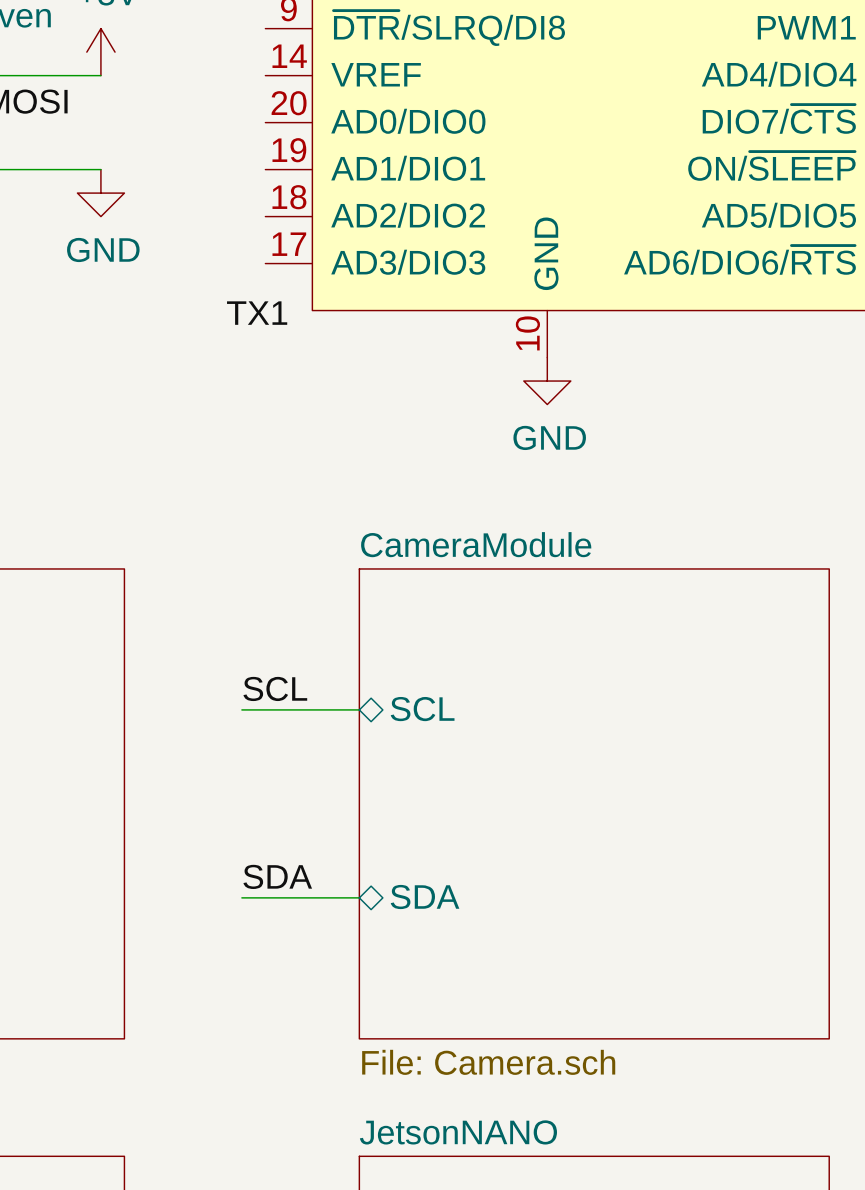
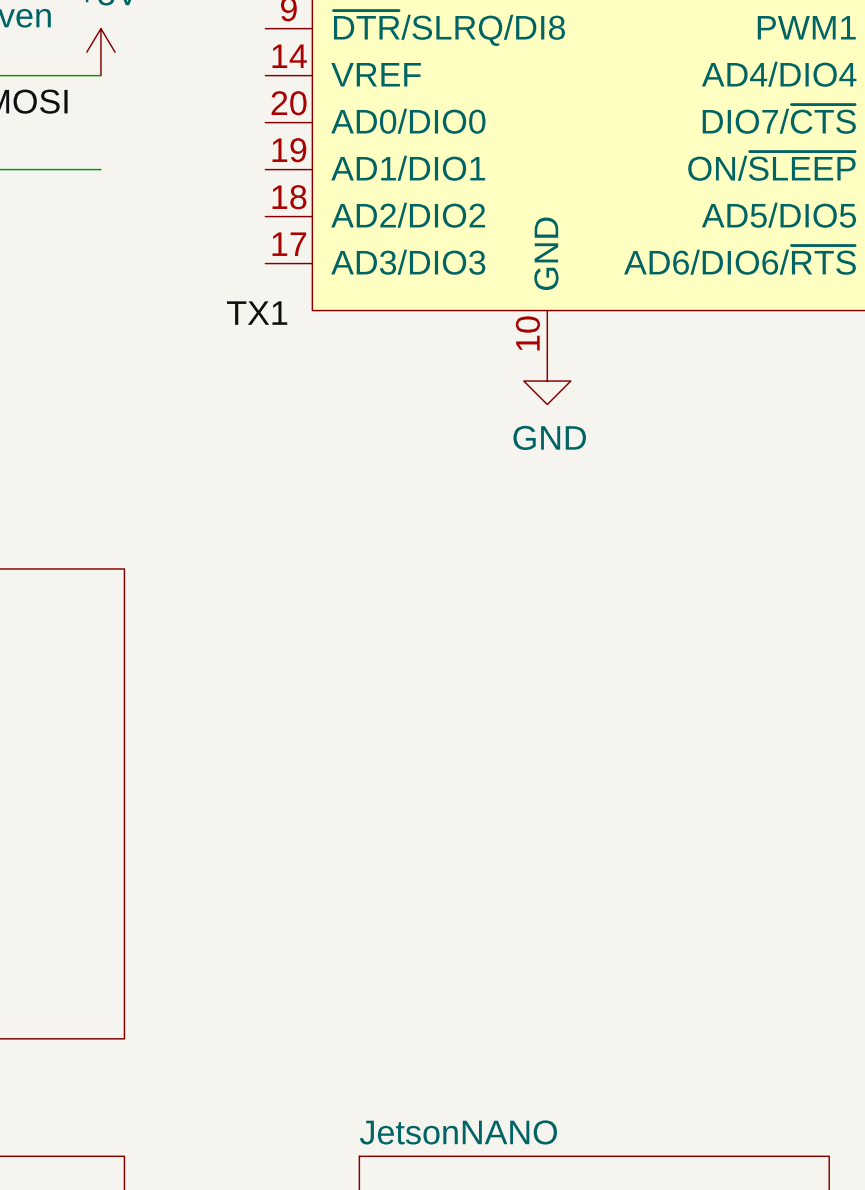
power symbol: GND (100, 193) -> none
label: SCL (275, 688) -> none
wire: (241, 709) (359, 709) -> none
sheet pin: SCL (422, 709) -> none
sheet CameraModule: File: Camera.sch (594, 803) -> none
label: SDA (277, 876) -> none
wire: (241, 897) (359, 897) -> none
sheet pin: SDA (425, 897) -> none

